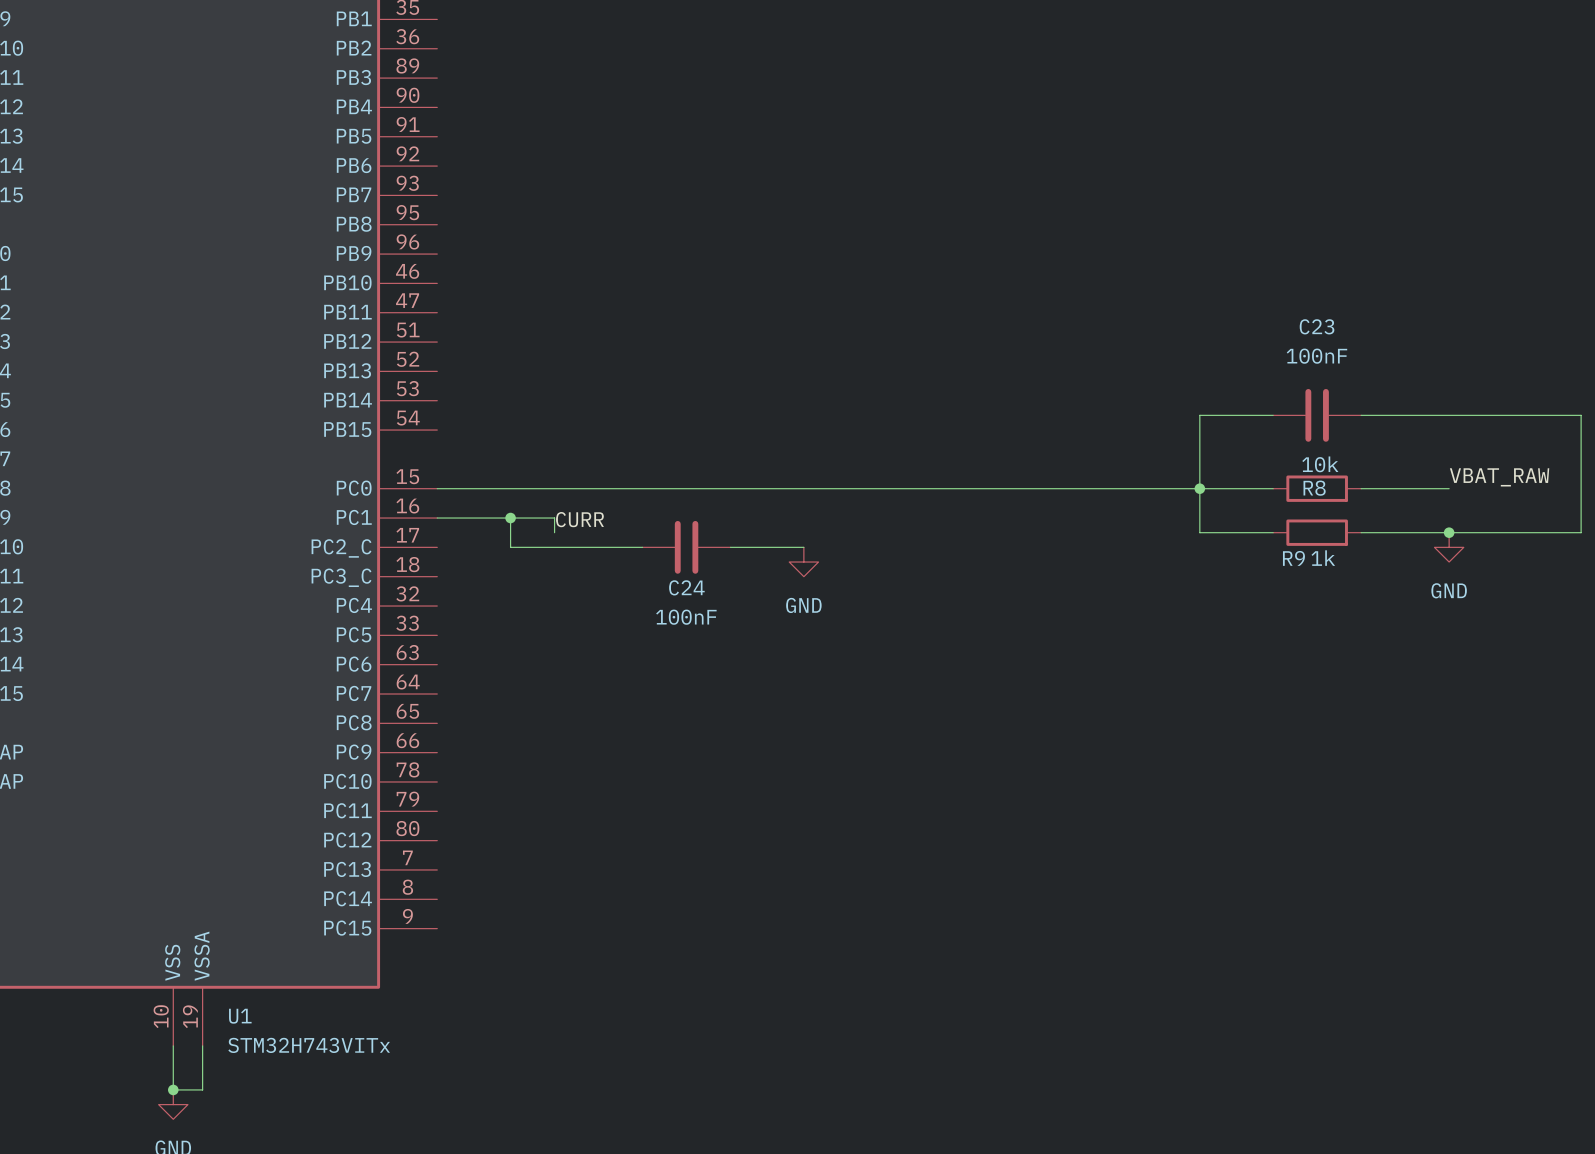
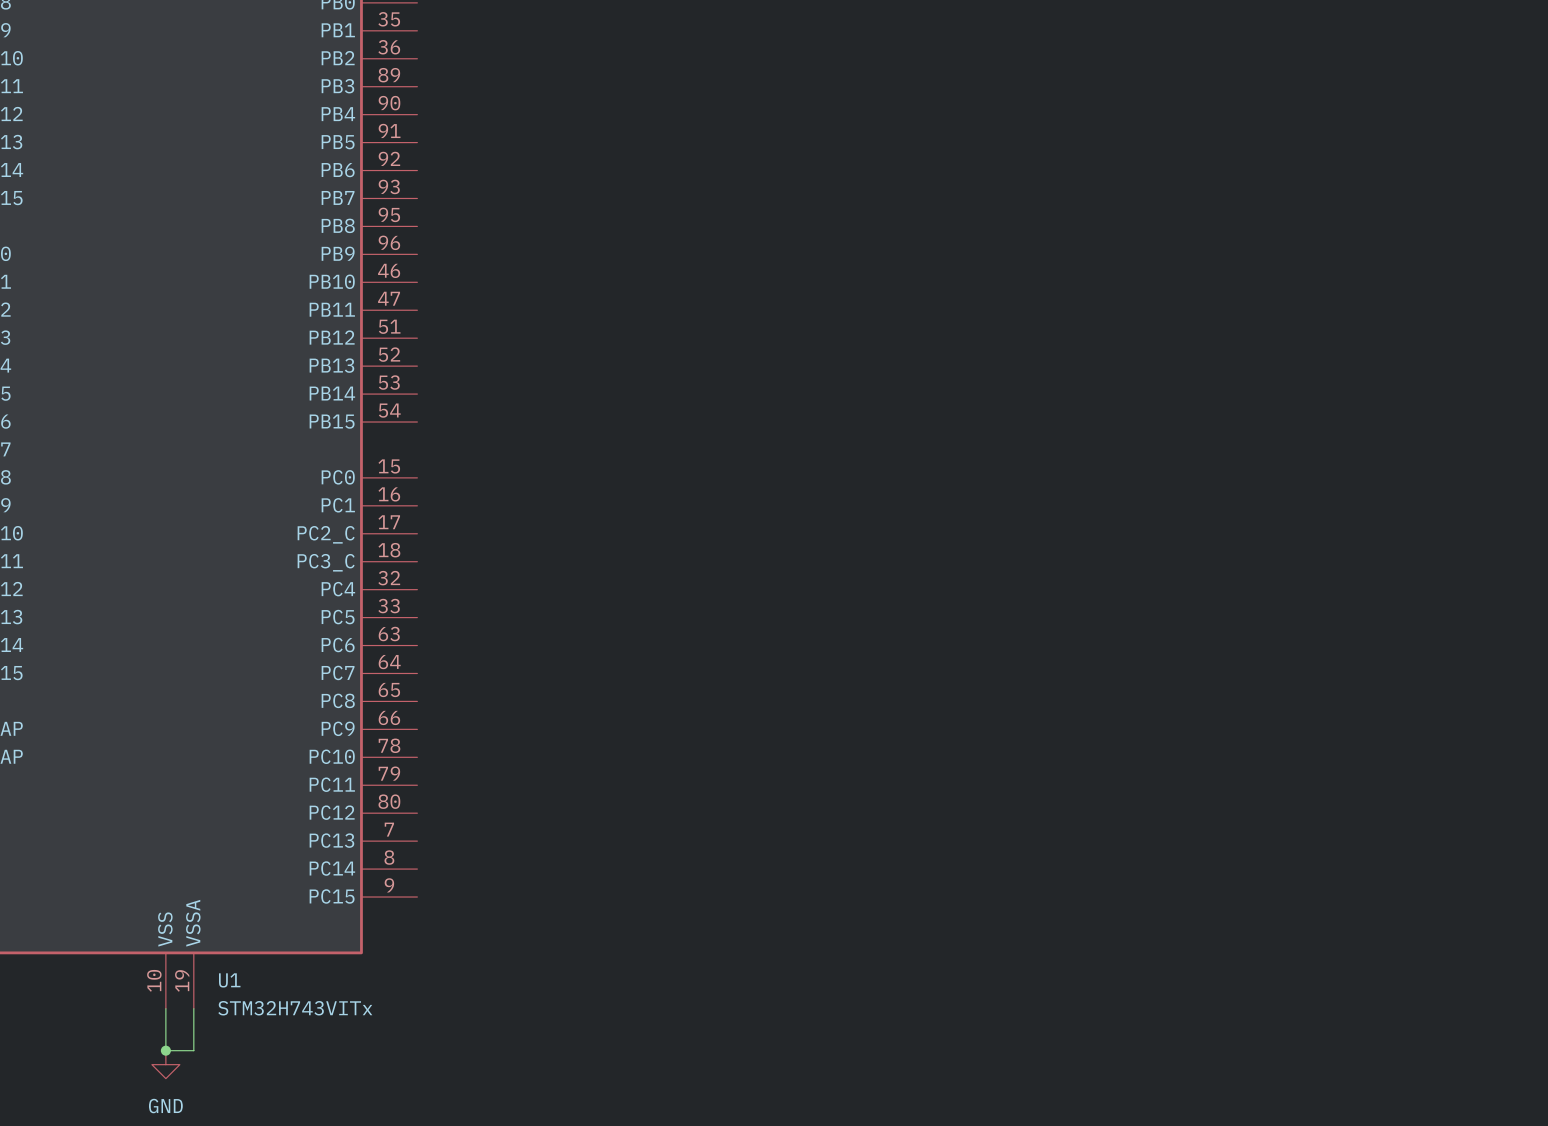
wire: (1273, 415) (1199, 415) (1199, 532) (1273, 532) -> none
C23: 100nF (1317, 415) -> none
wire: (1361, 415) (1581, 415) (1581, 532) (1361, 532) -> none
label: VBAT_RAW (1499, 477) -> none
wire: (437, 488) (1273, 488) -> none
junction: (1199, 488) -> none
R8: 10k (1317, 488) -> none
wire: (1361, 488) (1449, 488) -> none
wire: (437, 518) (554, 518) (554, 532) -> none
wire: (510, 518) (510, 547) (642, 547) -> none
junction: (510, 518) -> none
label: CURR (579, 519) -> none
R9: 1k (1317, 532) -> none
junction: (1449, 532) -> none
C24: 100nF (686, 547) -> none
wire: (730, 547) (803, 547) -> none
power symbol: GND (1449, 547) -> none
power symbol: GND (803, 562) -> none

